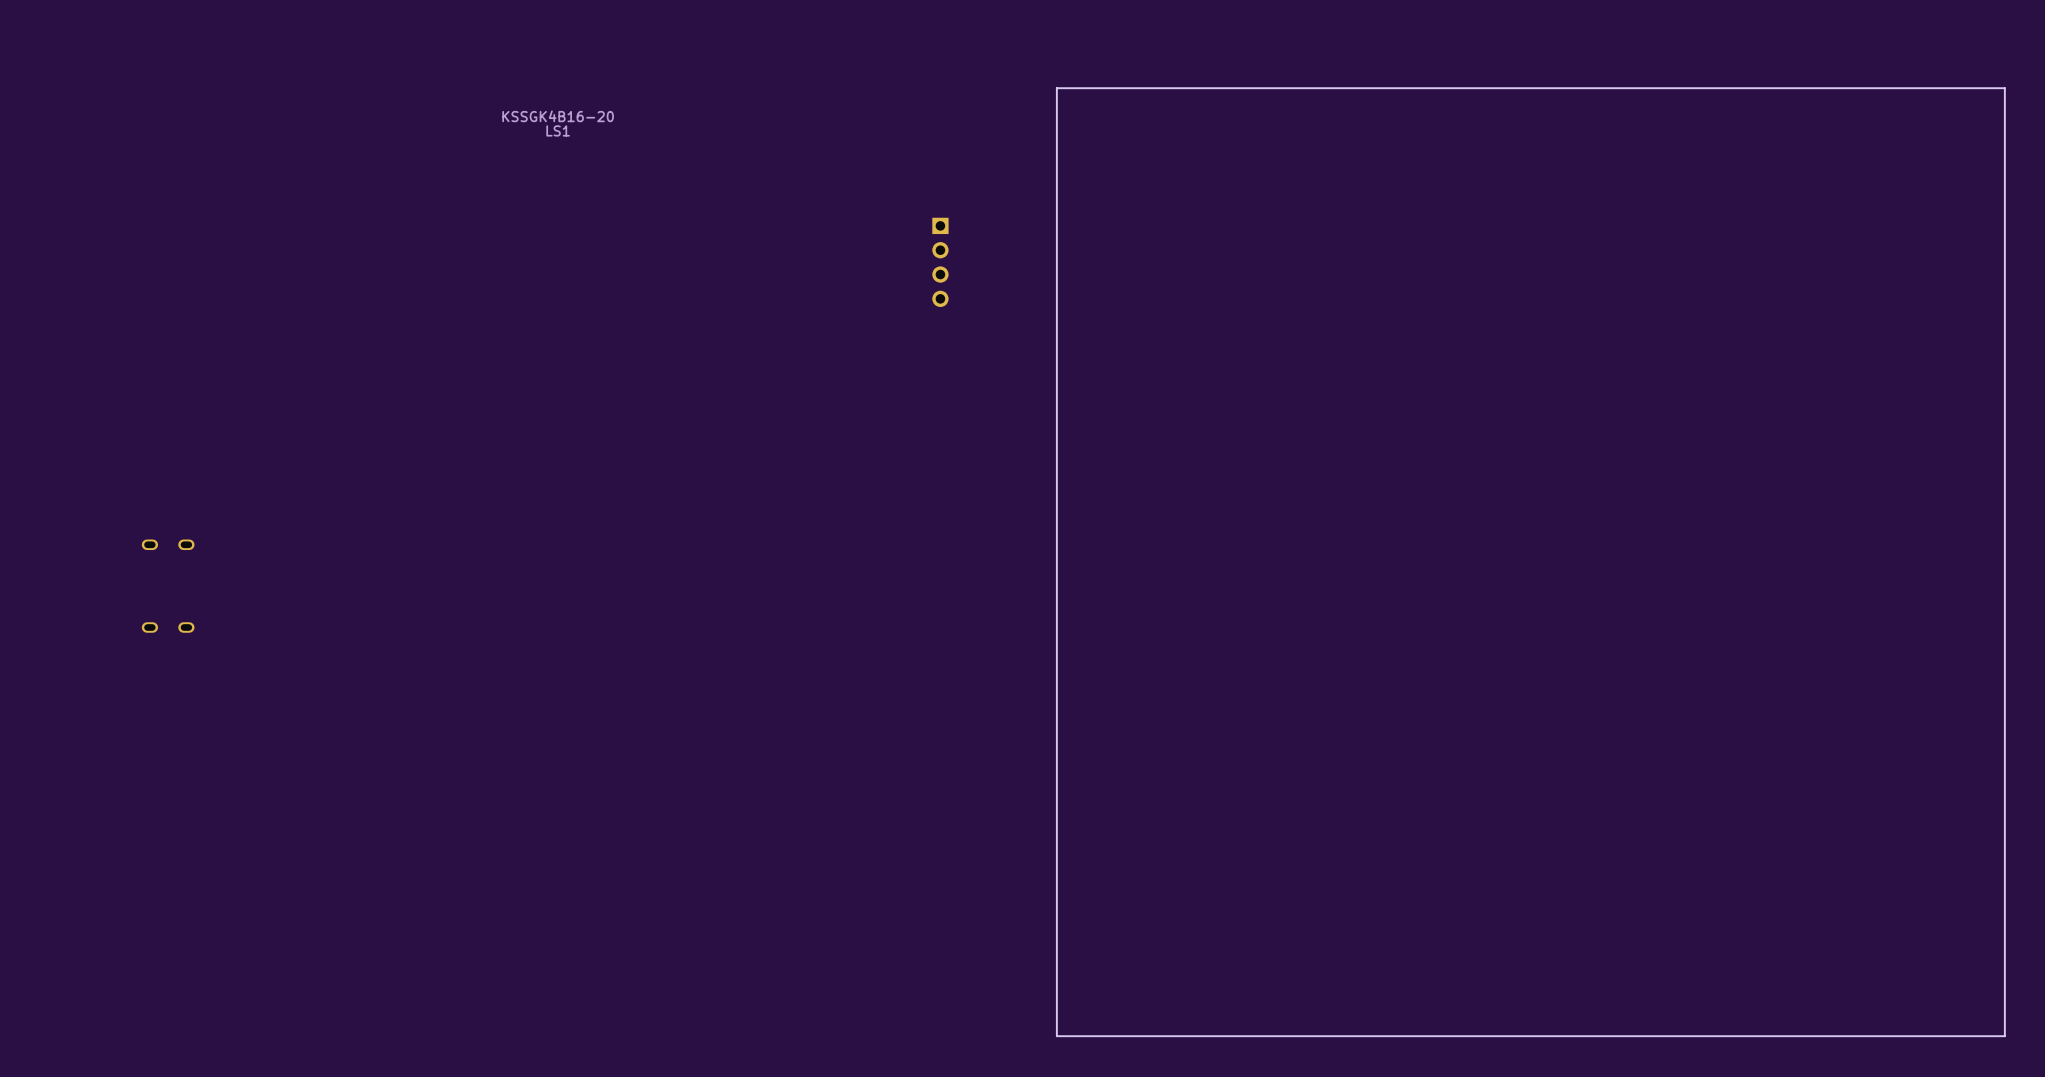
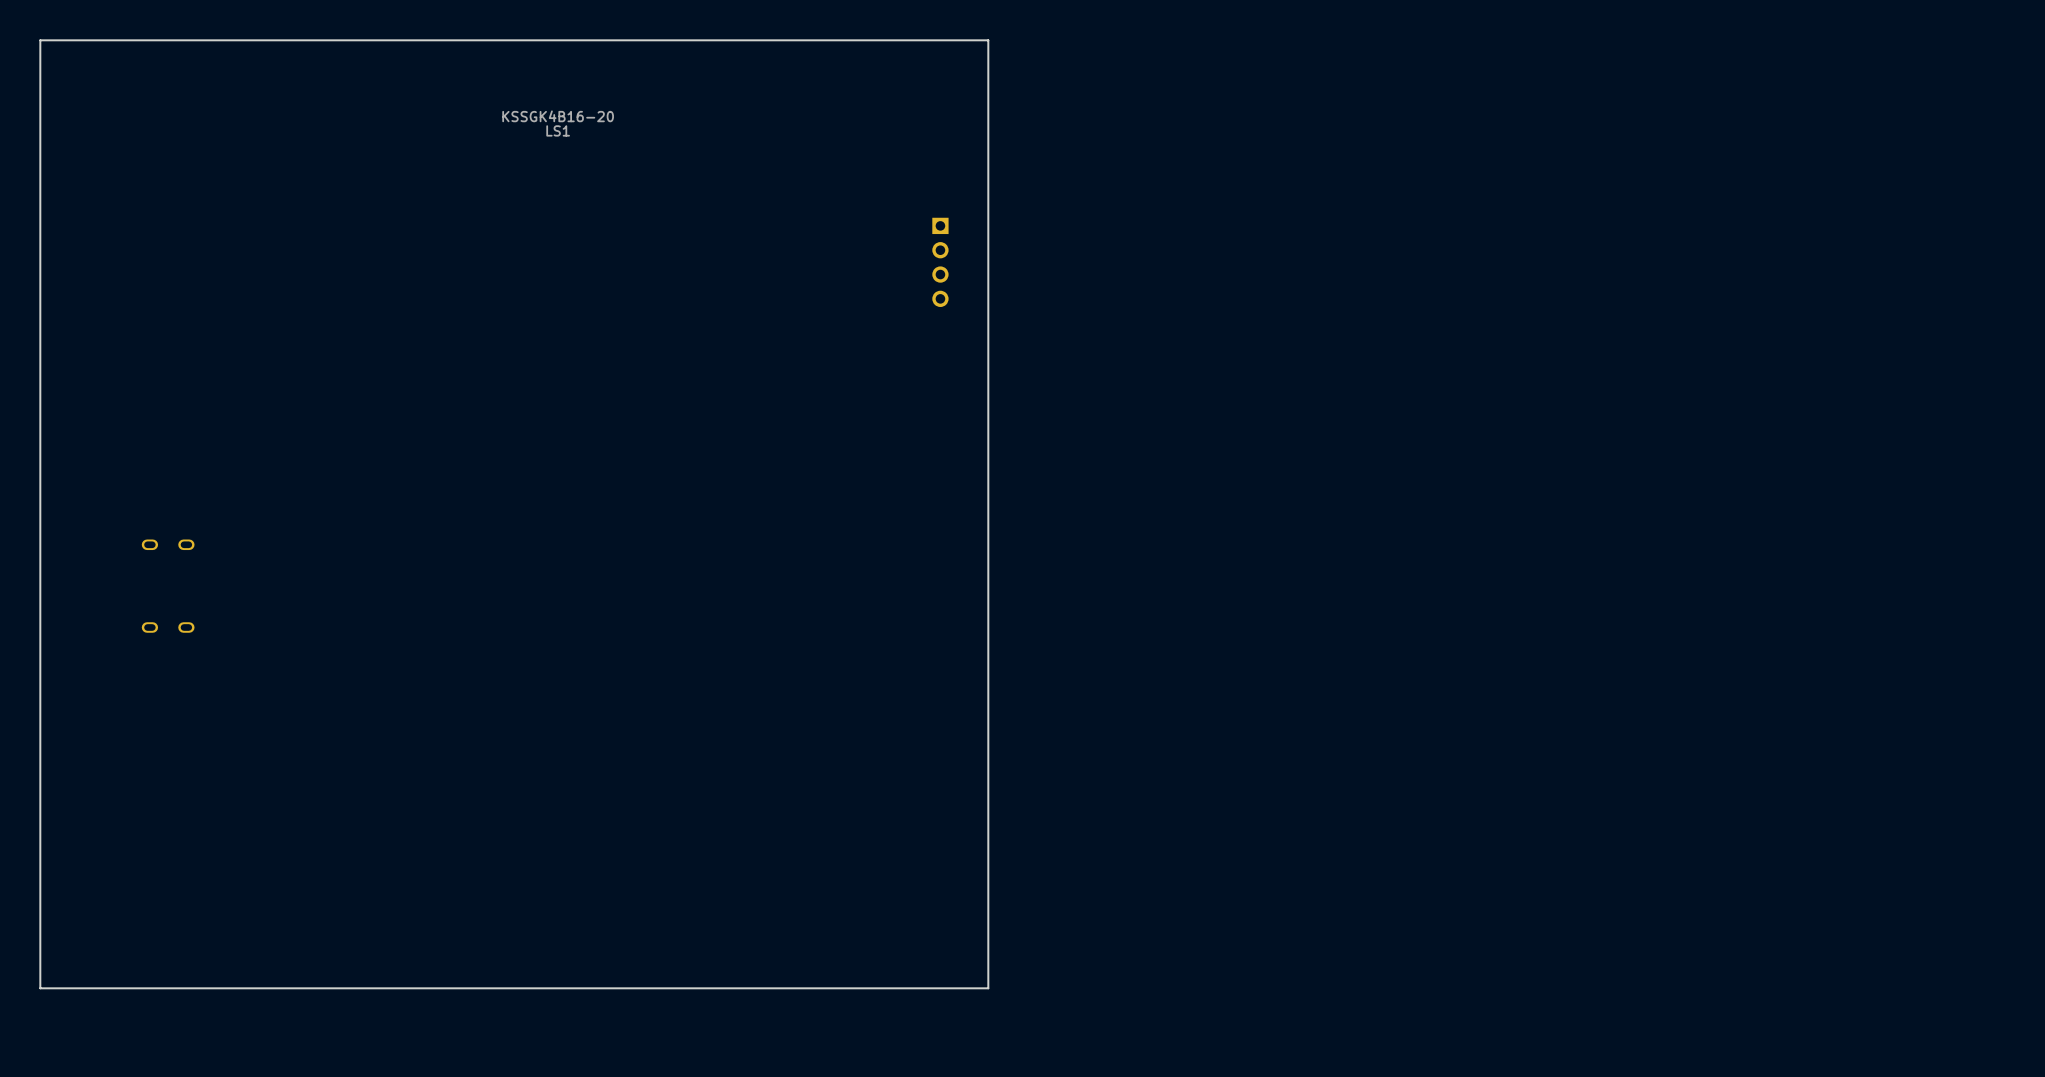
board edge: none -> (988, 40) (40, 40) (40, 988) (988, 988) (988, 40)
board edge: (2004, 88) (1056, 88) (1056, 1036) (2004, 1036) (2004, 88) -> none

